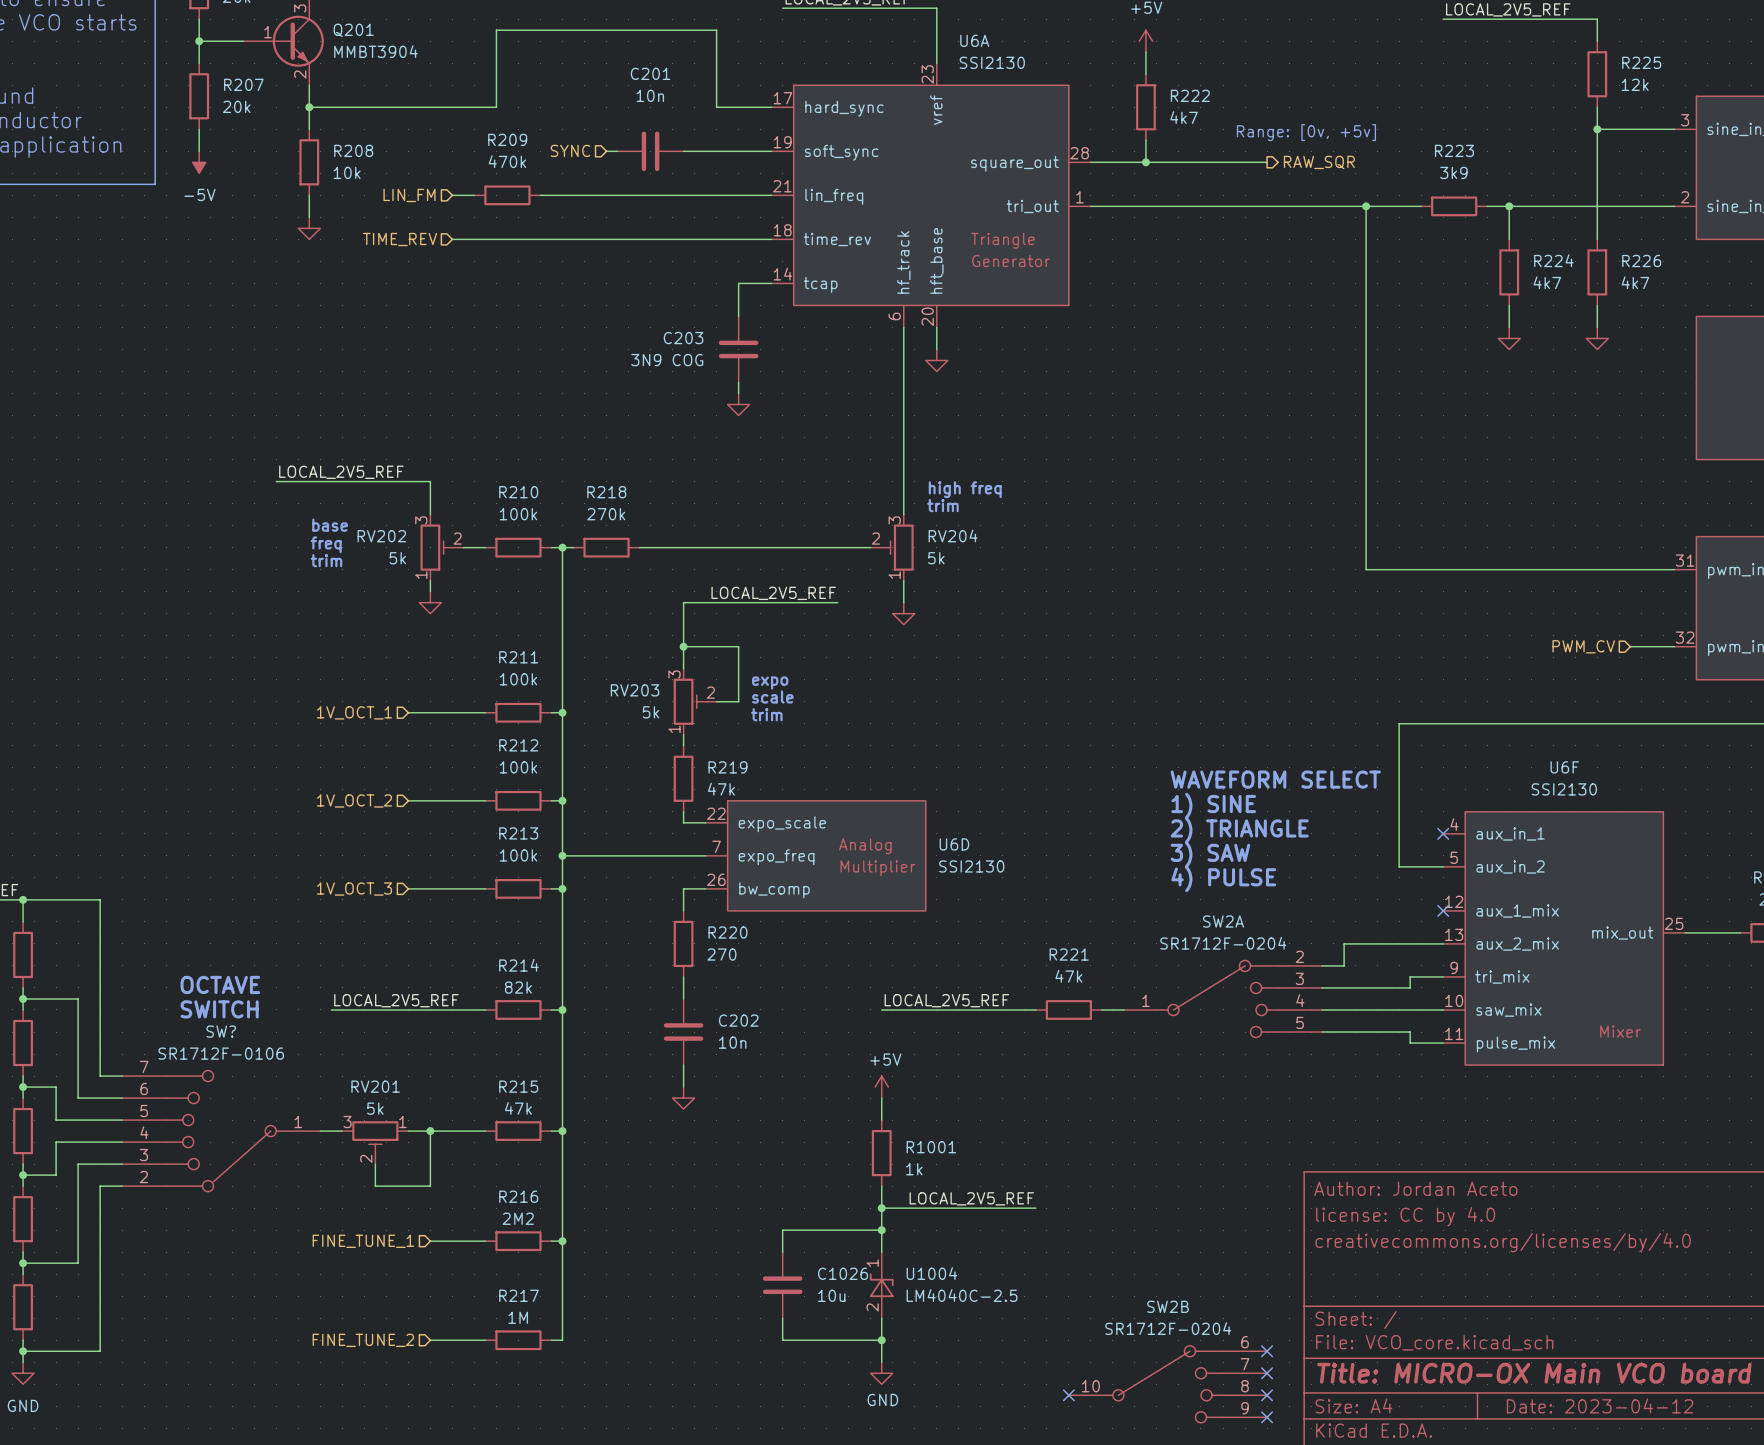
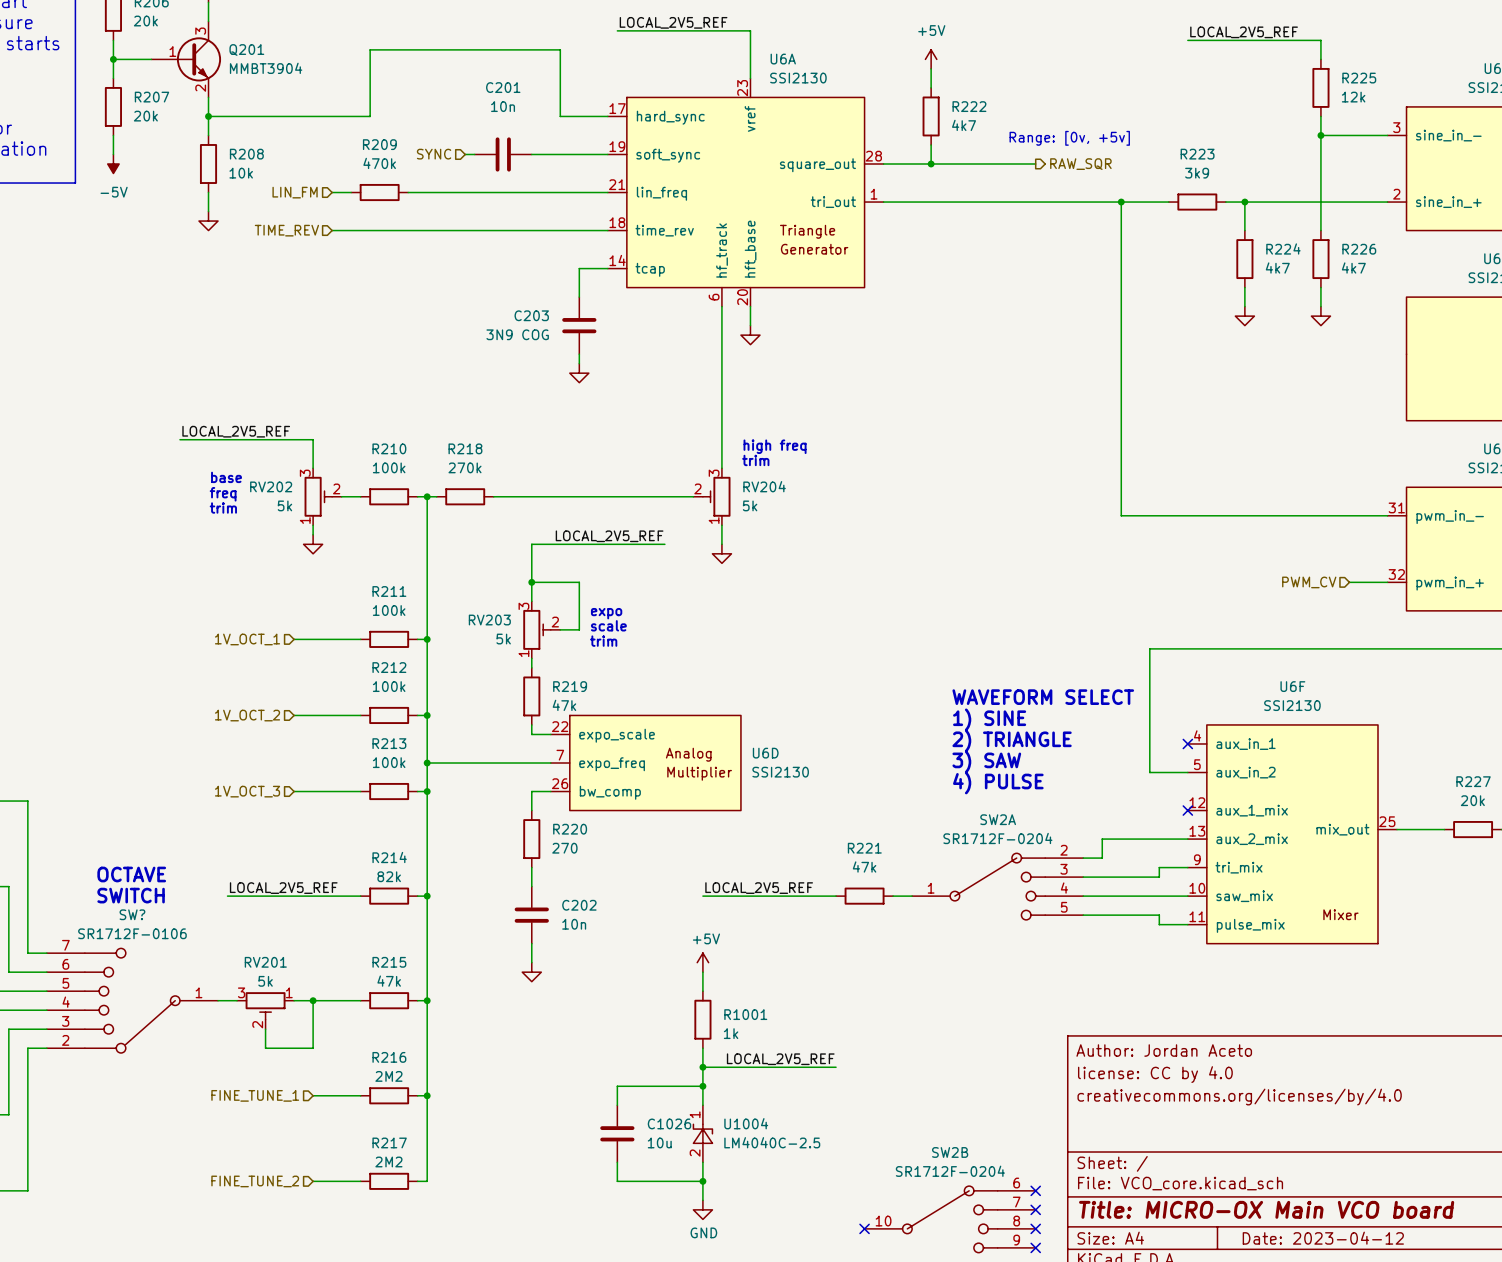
R217 value: 1M (518, 1317) -> 2M2 (388, 1161)

